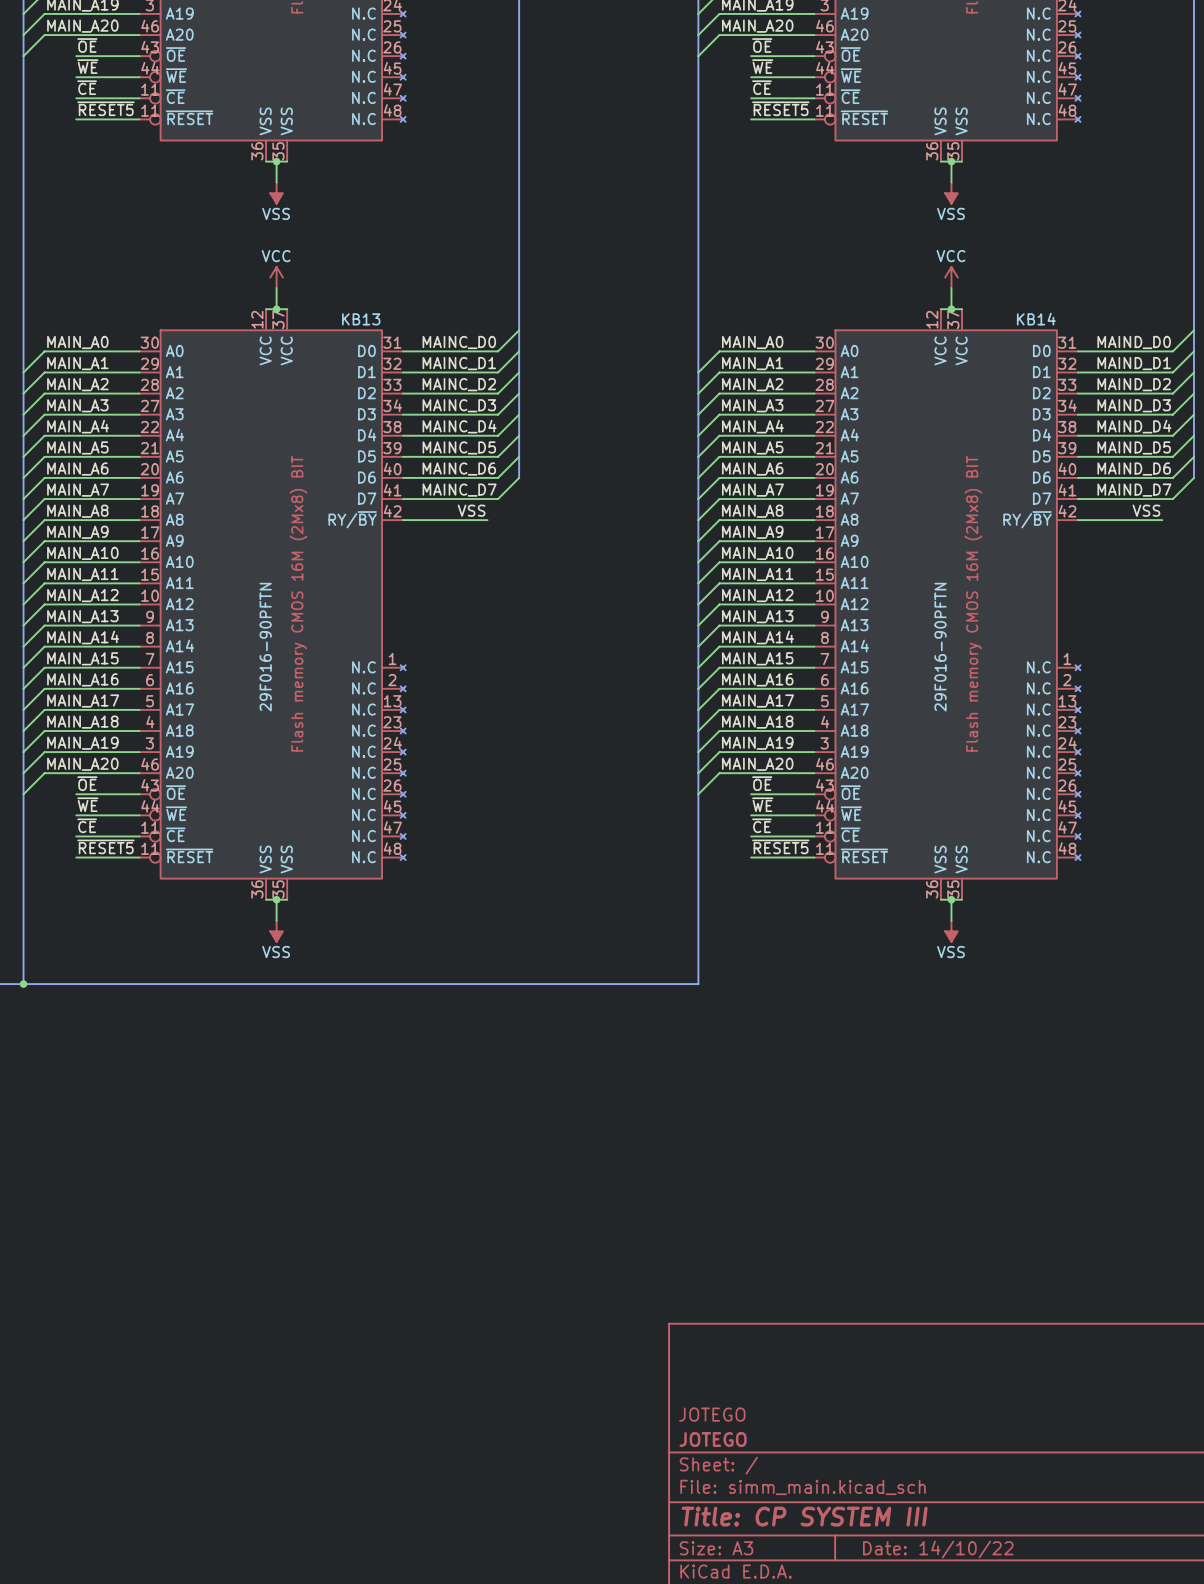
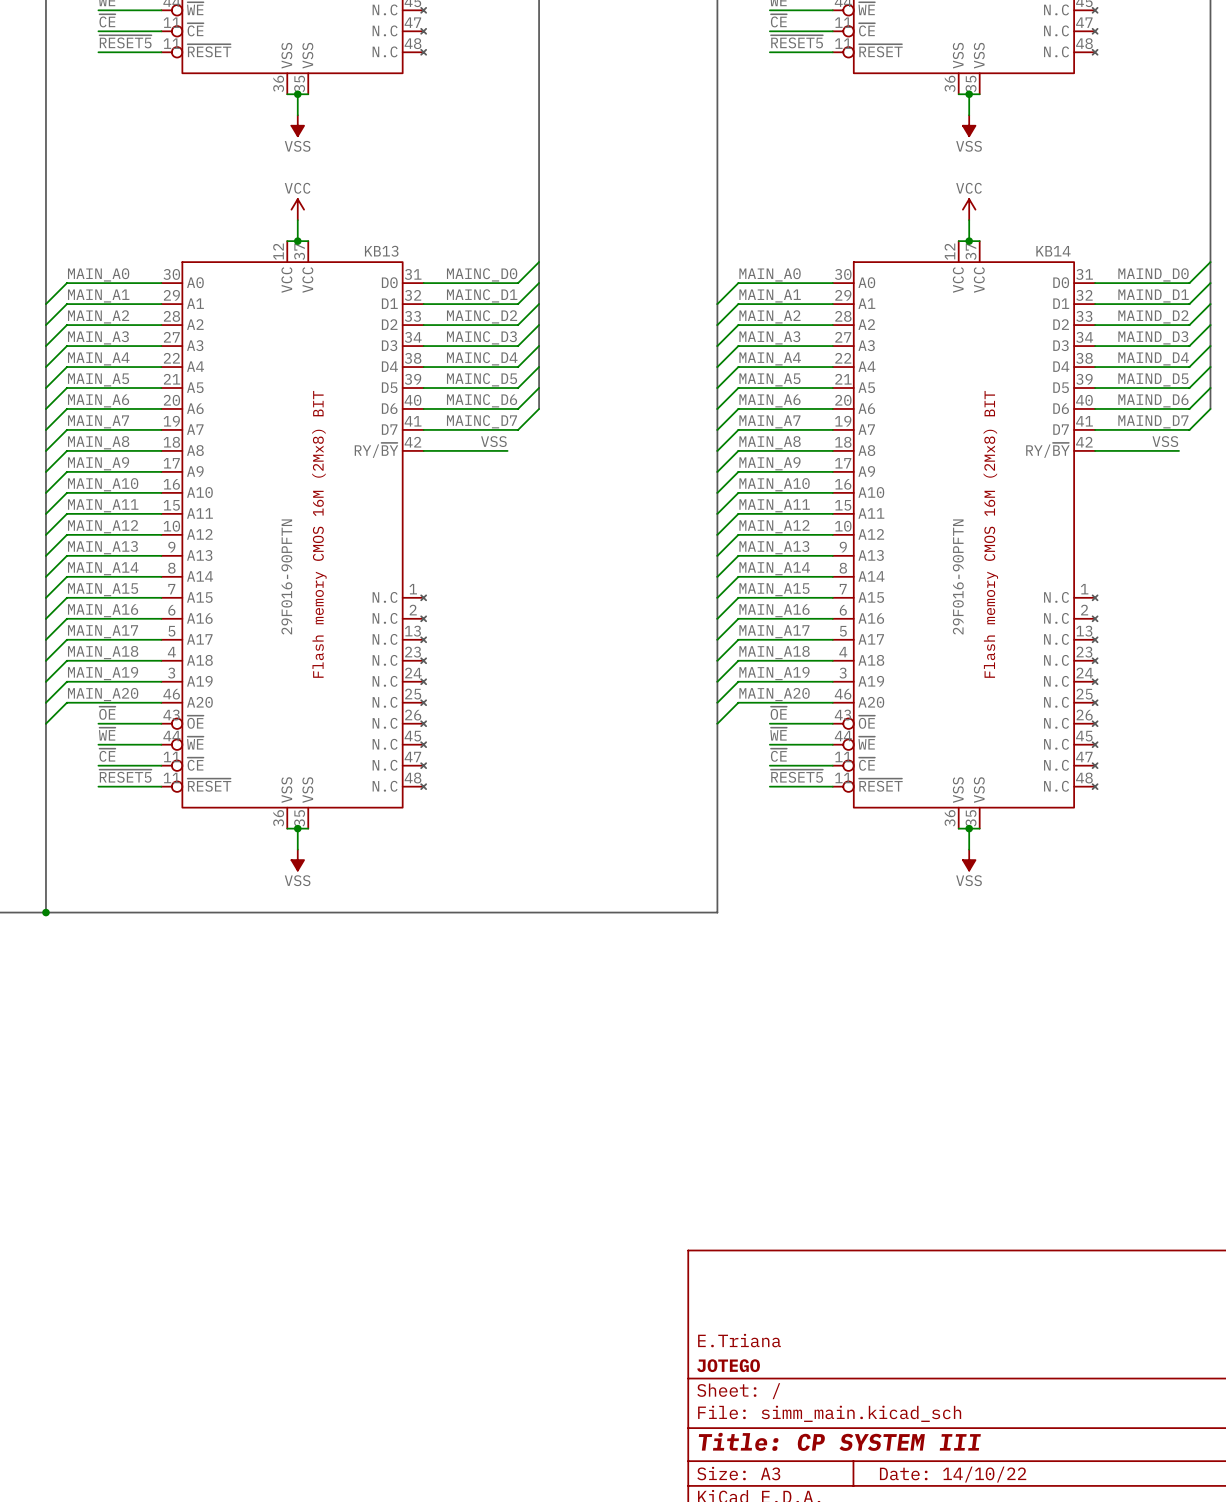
title block: JOTEGO (712, 1414) -> E.Triana (739, 1340)

